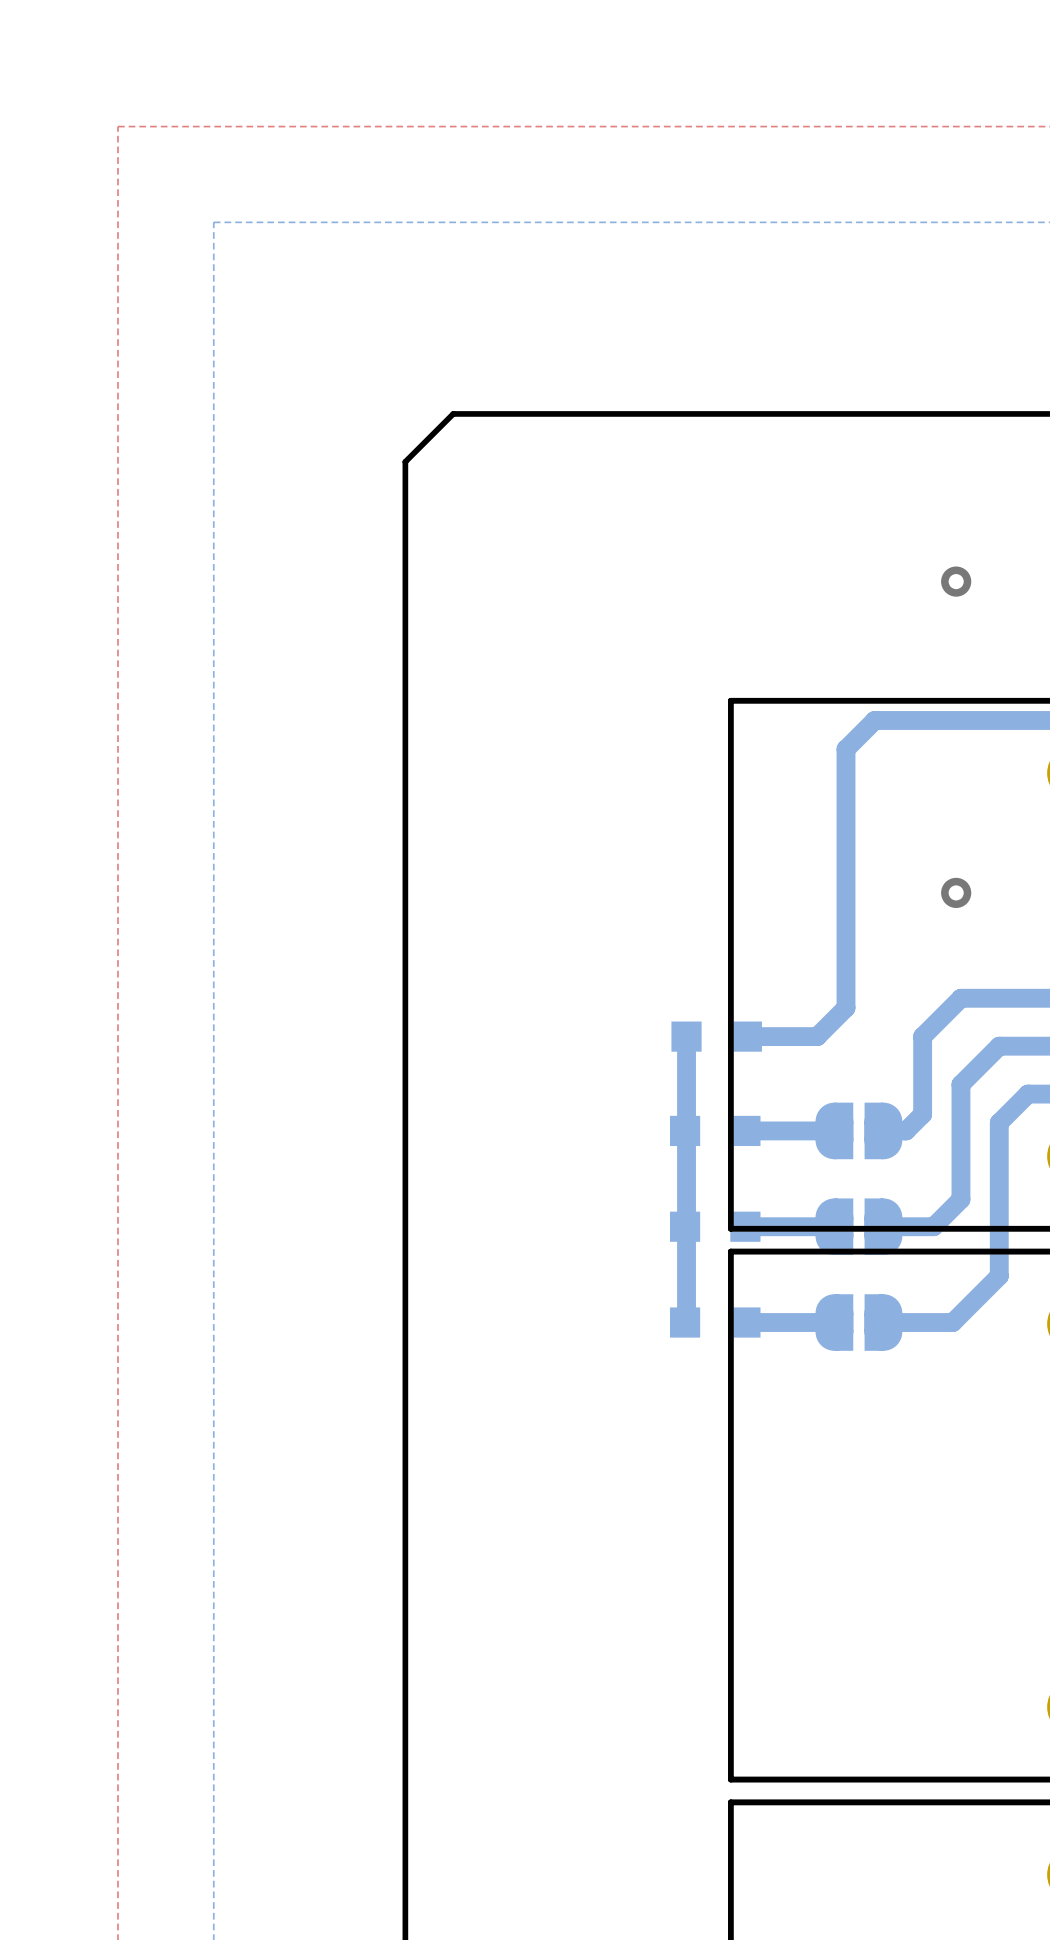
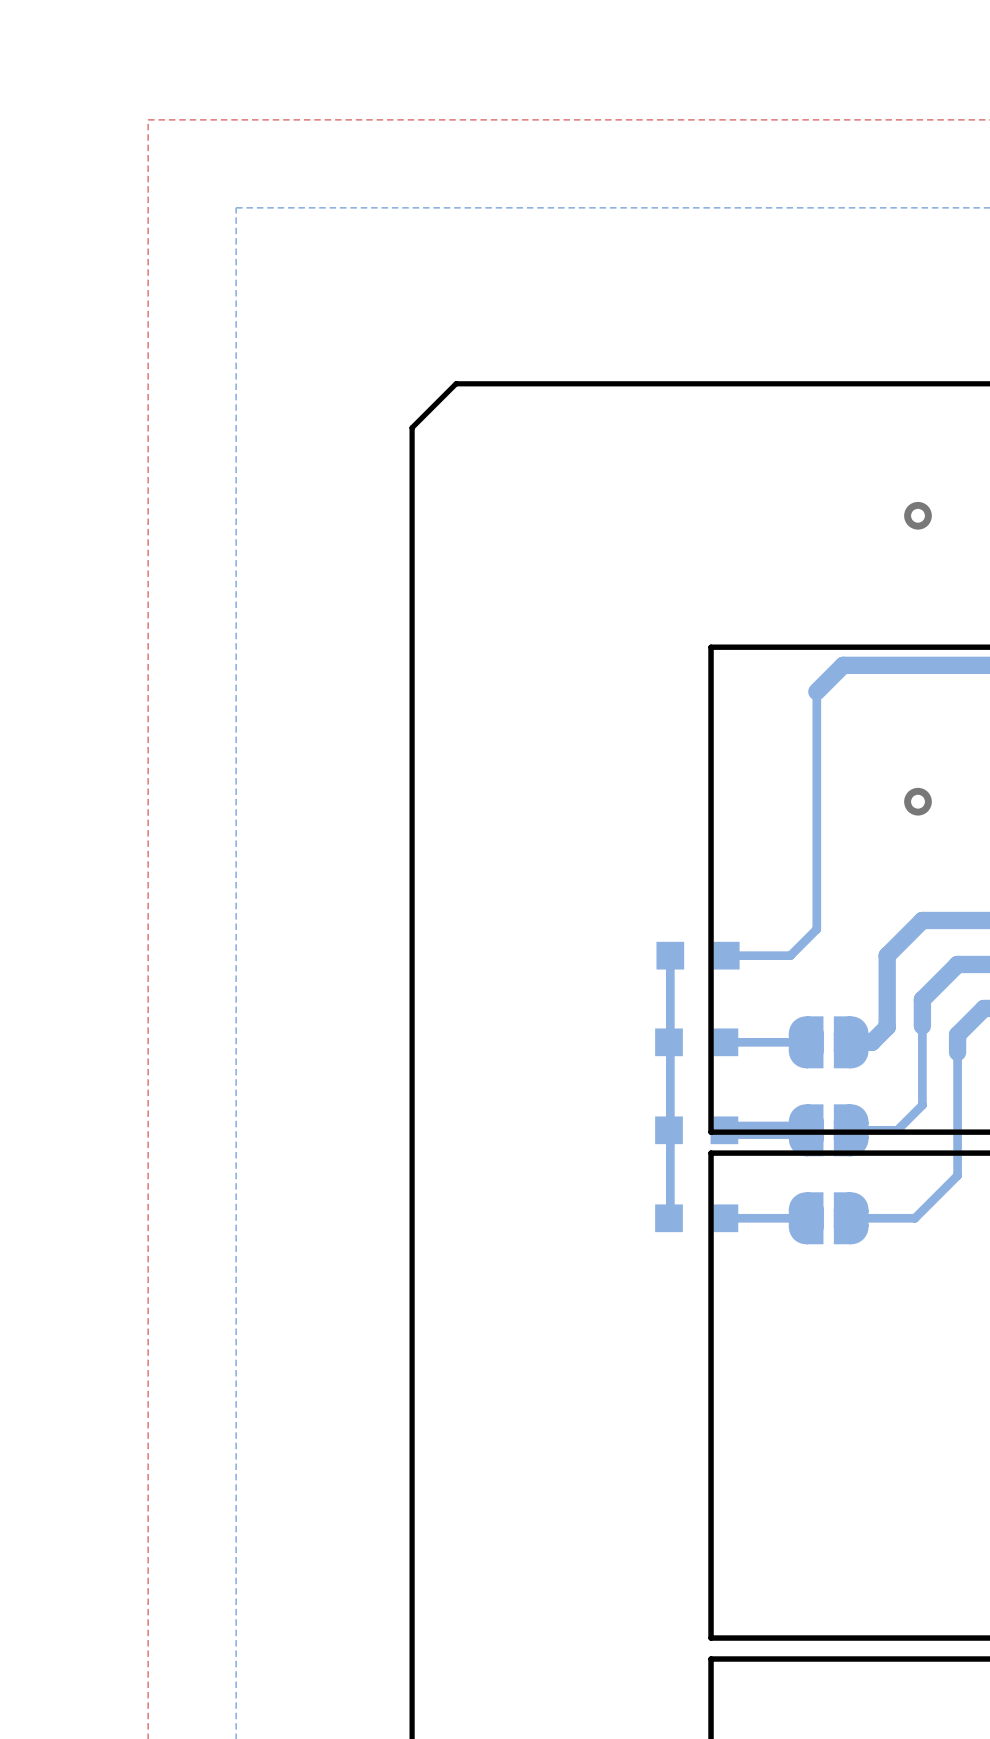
via position: (956, 581) -> (917, 515)
bottom track width: thick (846, 749) (846, 1007) (817, 1036) (746, 1036) -> thin (816, 691) (816, 929) (790, 955) (725, 955)
via position: (956, 892) -> (917, 801)
bottom track width: thick (686, 1036) (685, 1322) -> thin (670, 955) (668, 1218)
bottom track width: thick (960, 1113) (960, 1199) (933, 1226) (883, 1226) -> thin (922, 1026) (922, 1105) (897, 1130) (851, 1130)
bottom track width: thick (745, 1130) (834, 1130) -> thin (724, 1042) (806, 1042)
bottom track width: thick (999, 1141) (999, 1276) (952, 1322) (883, 1322) -> thin (957, 1052) (957, 1175) (914, 1218) (851, 1218)
bottom track width: thick (745, 1322) (834, 1322) -> thin (724, 1218) (806, 1218)

